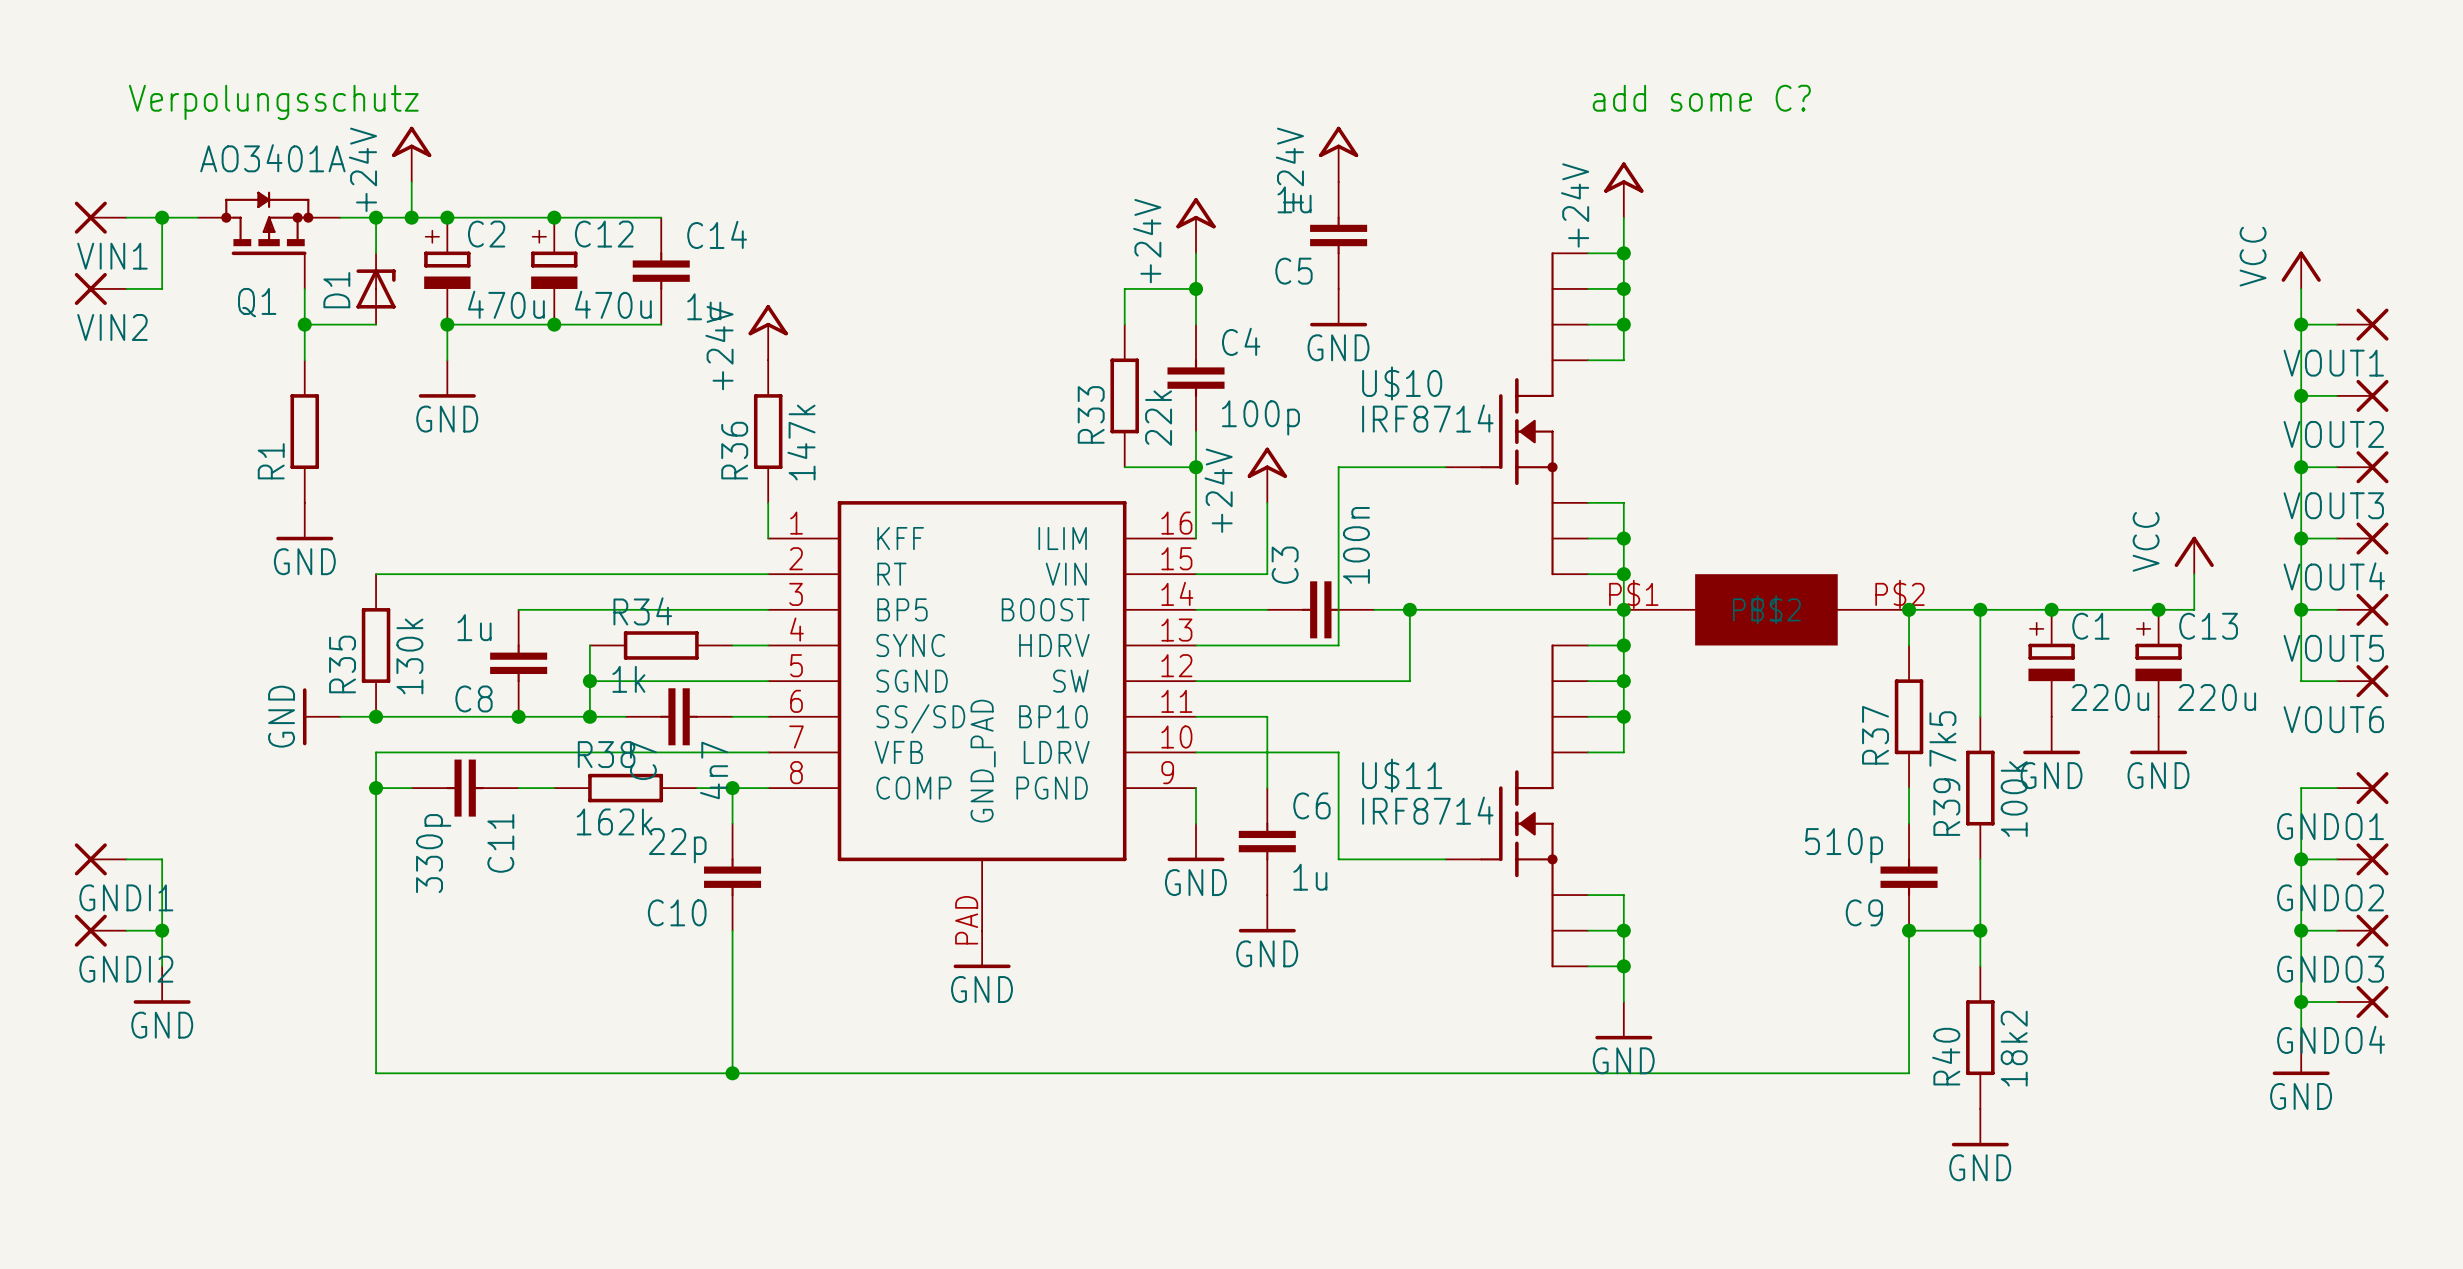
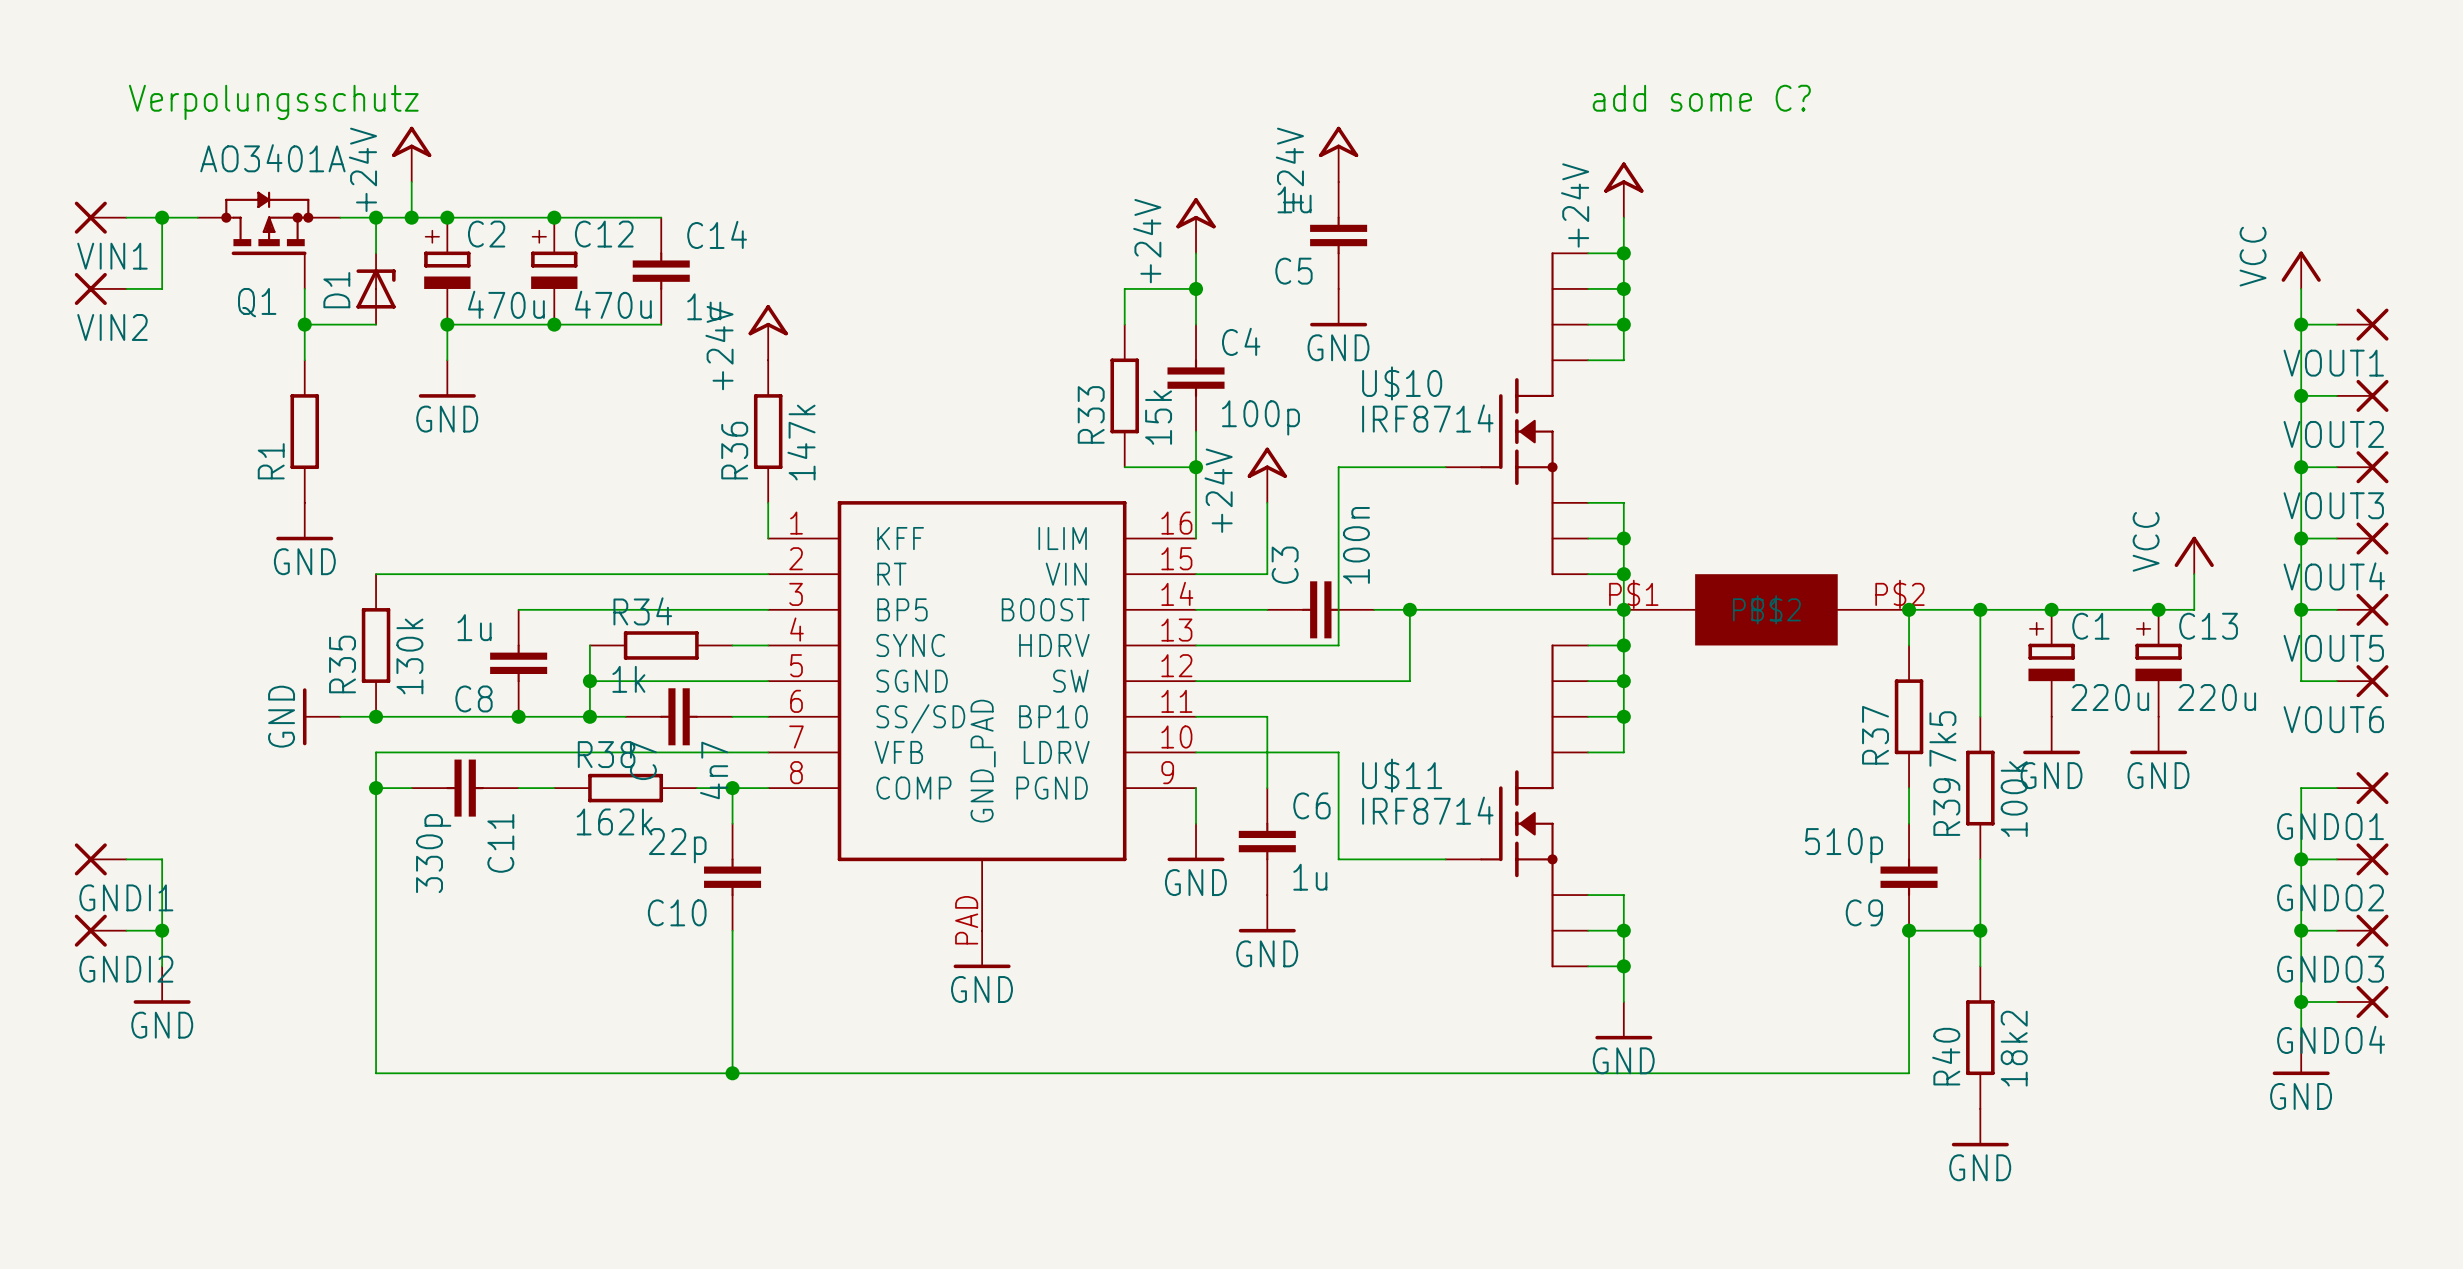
R33 value: 22k (1158, 418) -> 15k (1158, 417)

